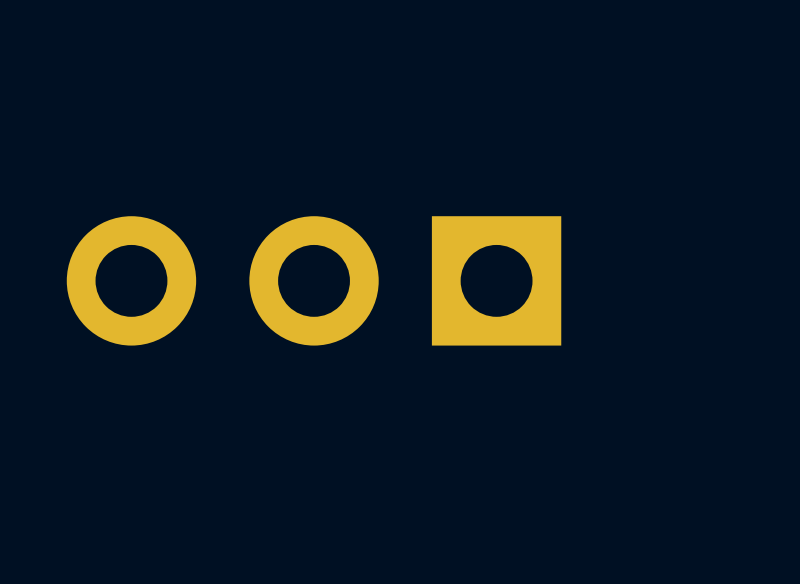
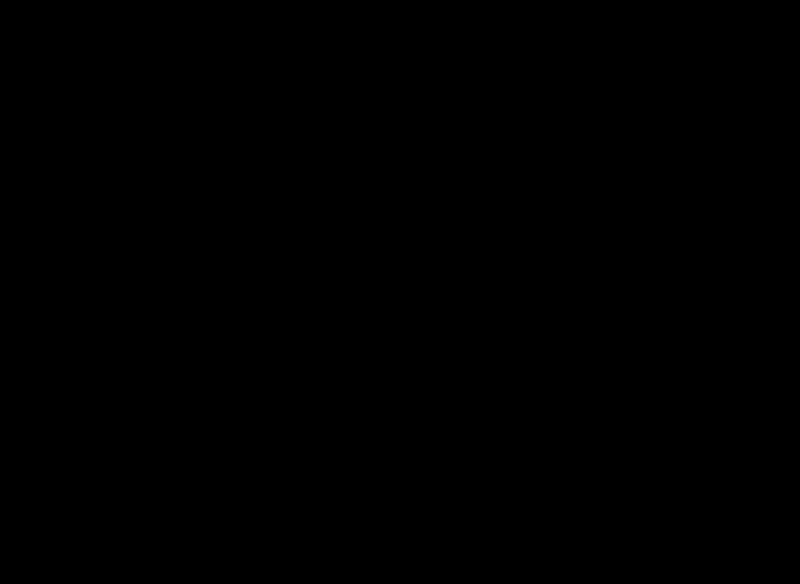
part: (314, 280) -> none

